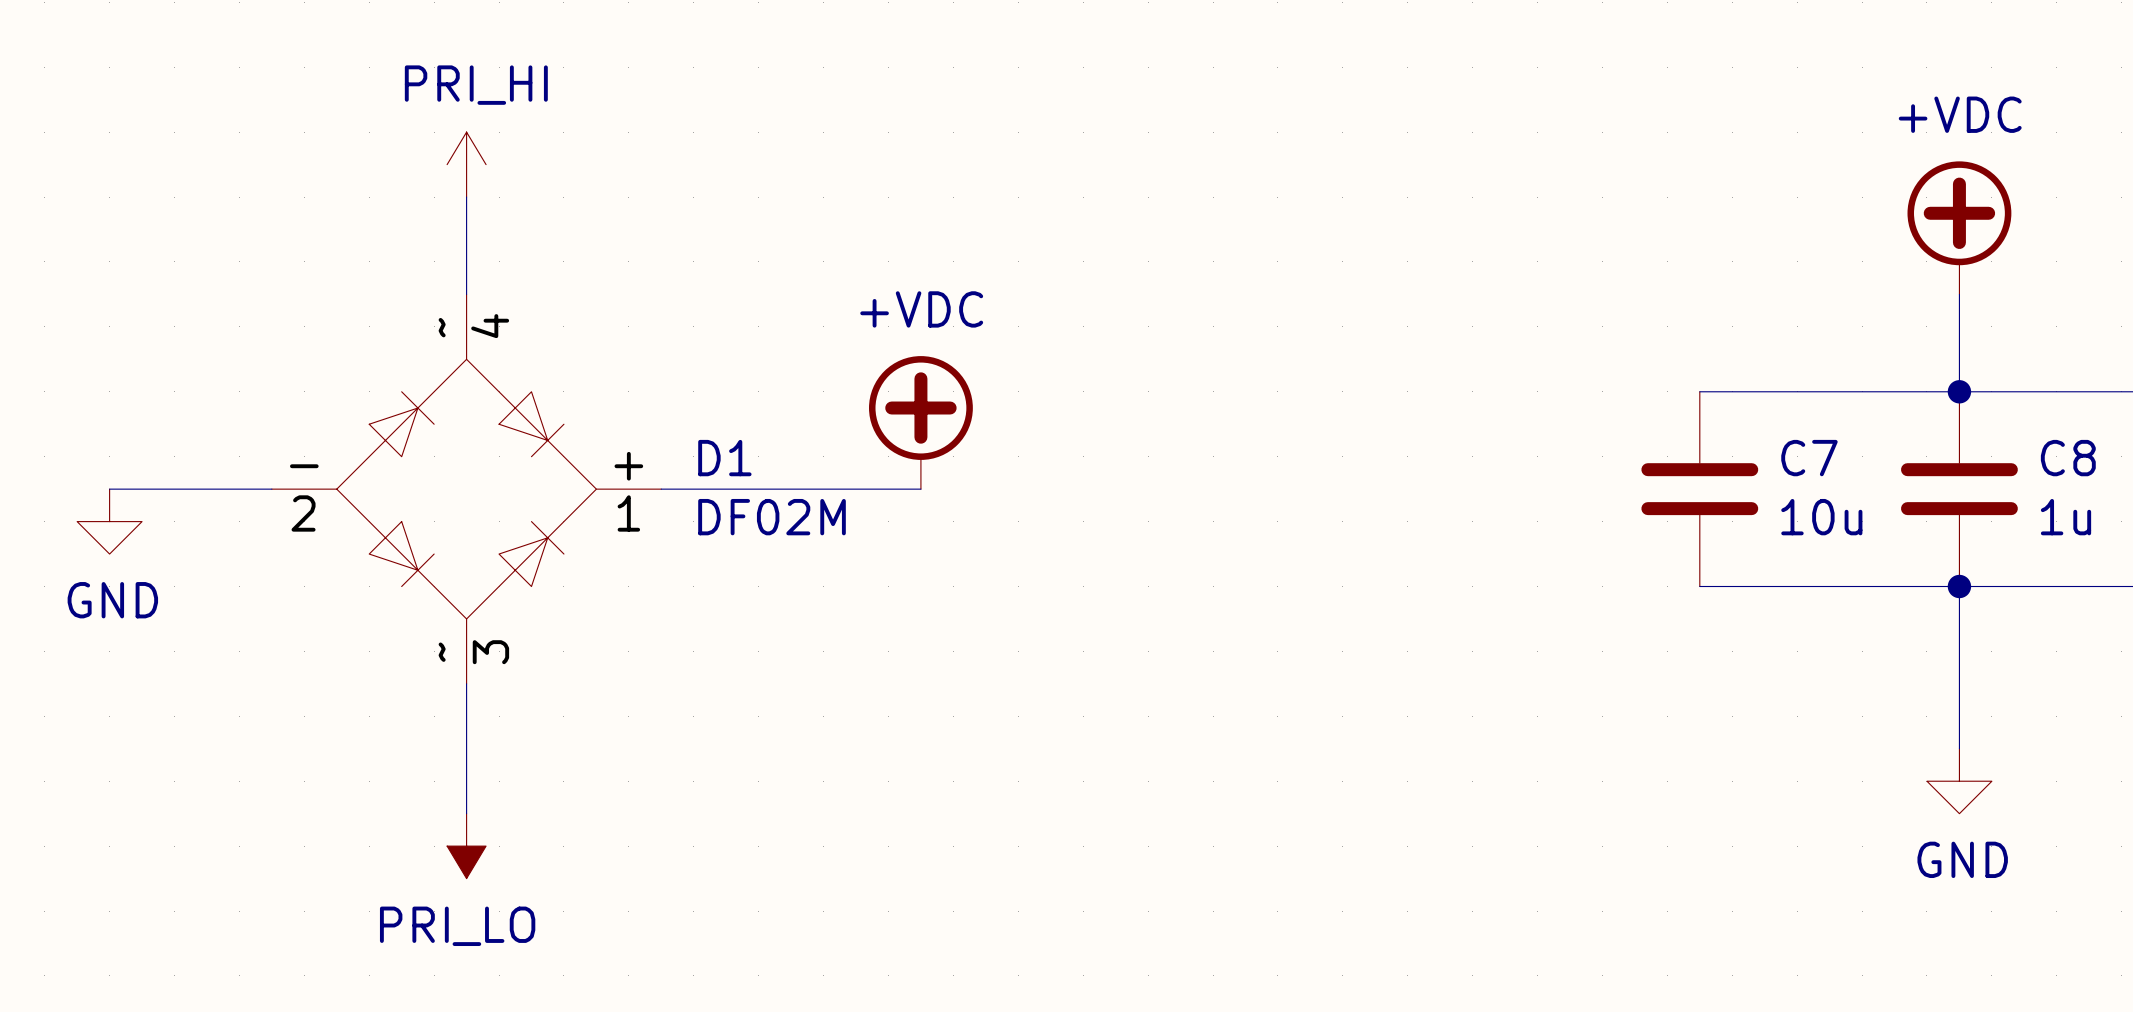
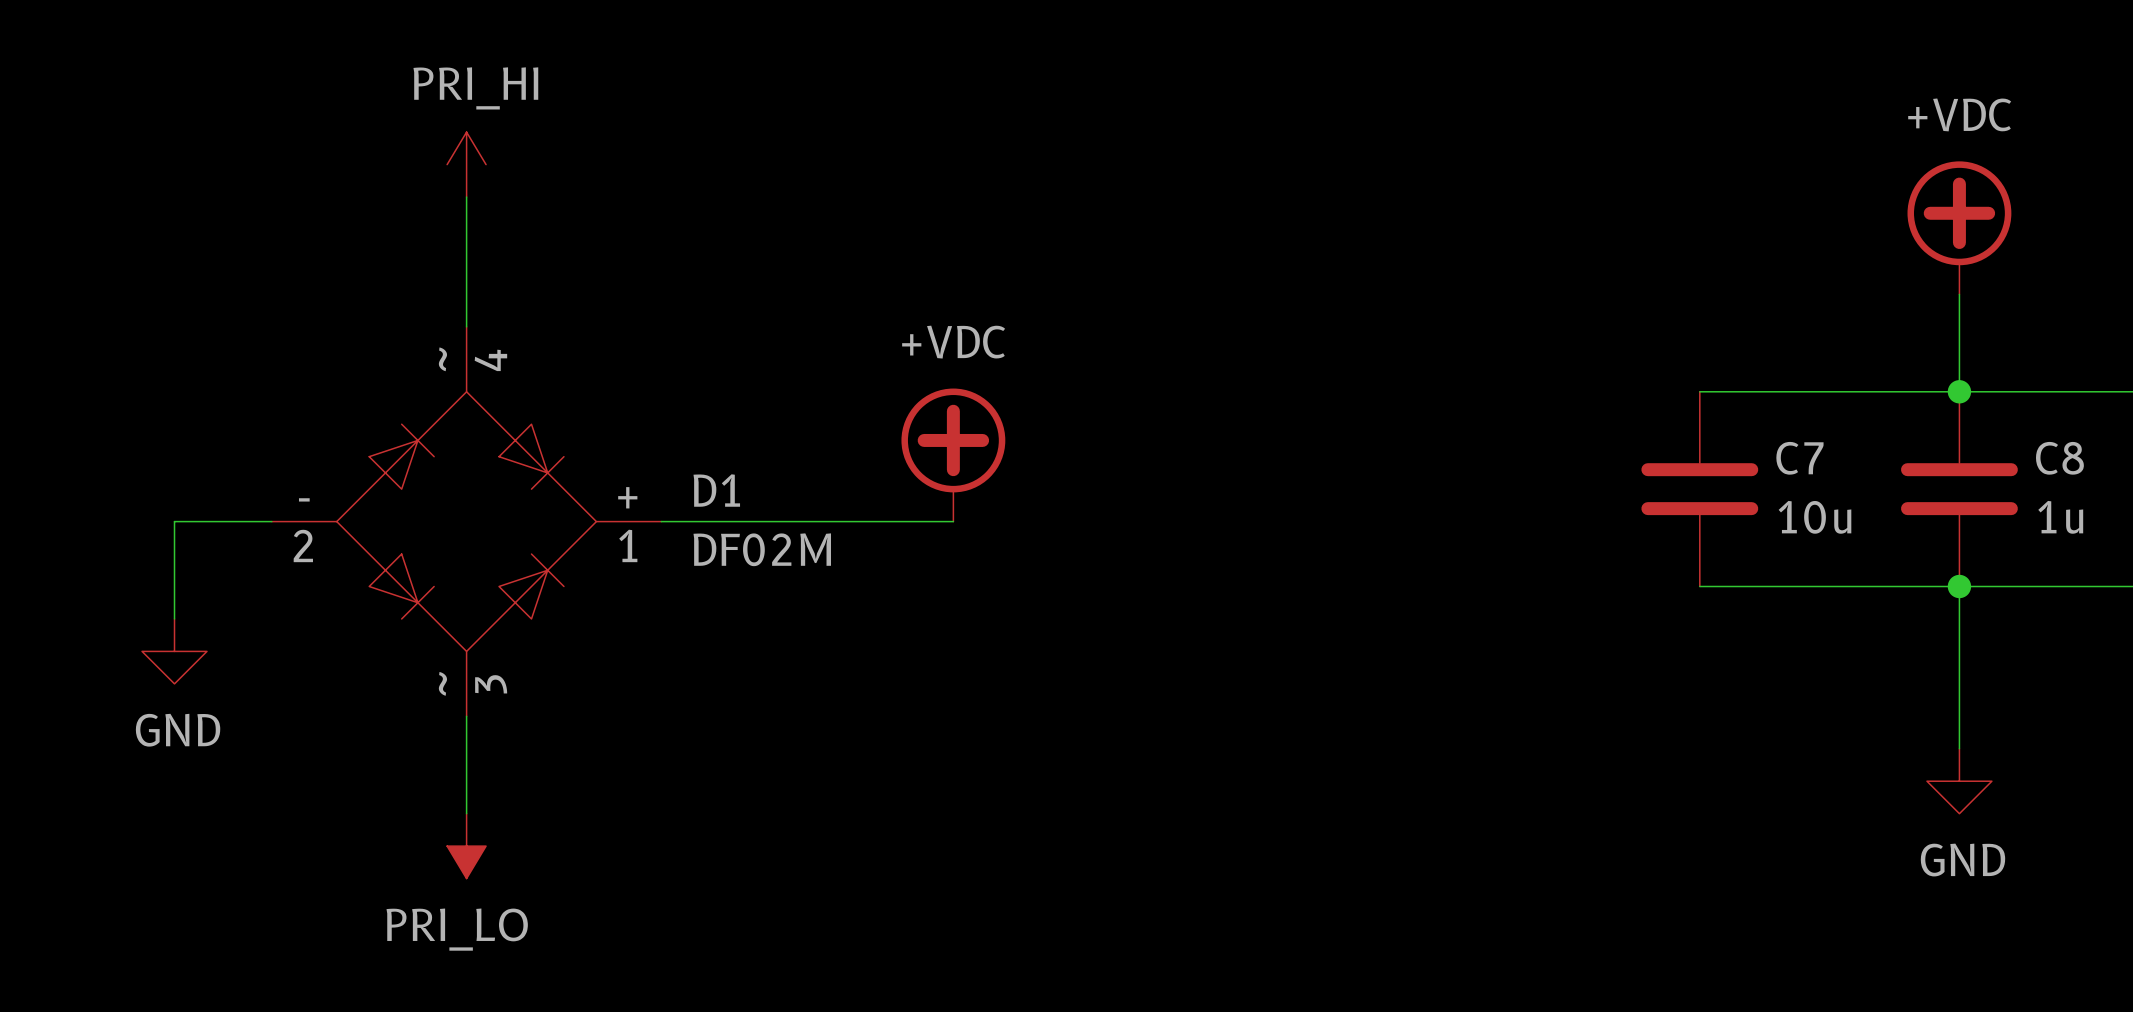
power symbol position: +VDC (920, 422) -> +VDC (953, 455)
wire: (109, 489) (271, 489) -> none
D1 position: (466, 489) -> (466, 521)
wire: (661, 489) (920, 489) -> none
power symbol position: GND (109, 521) -> GND (174, 651)
wire: none -> (271, 521) (174, 521) (174, 618)
wire: none -> (661, 521) (953, 521)

